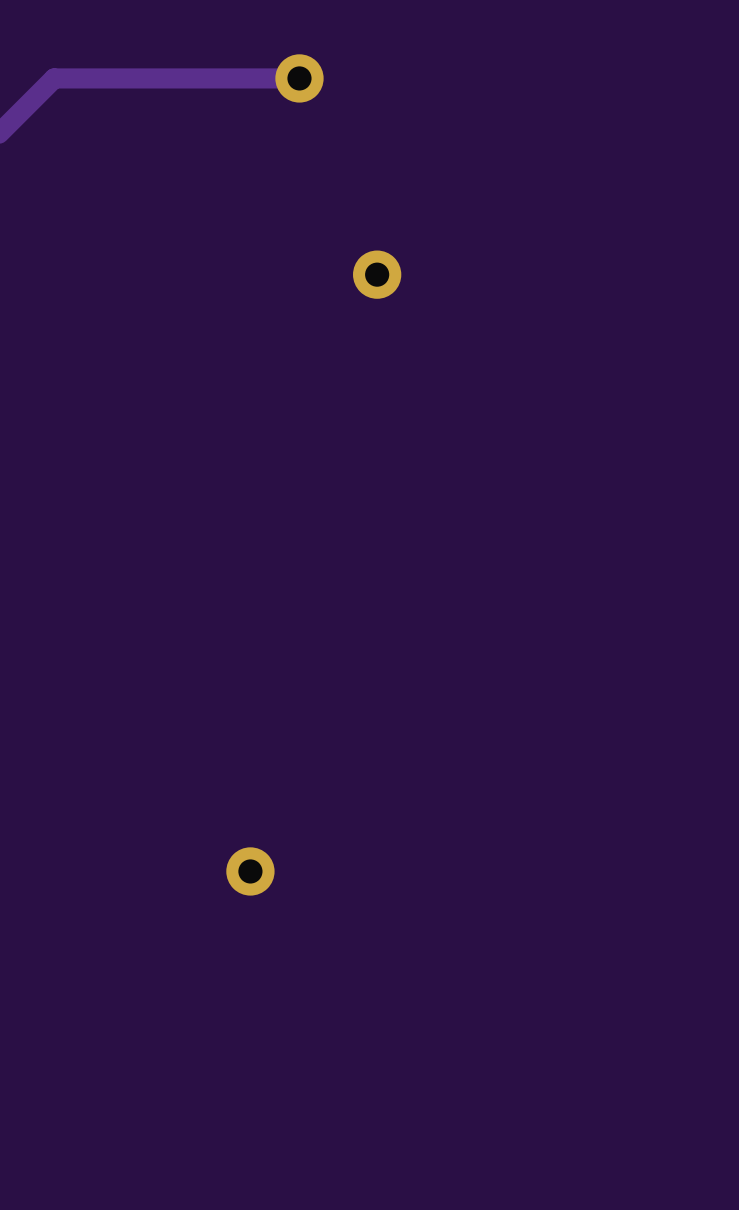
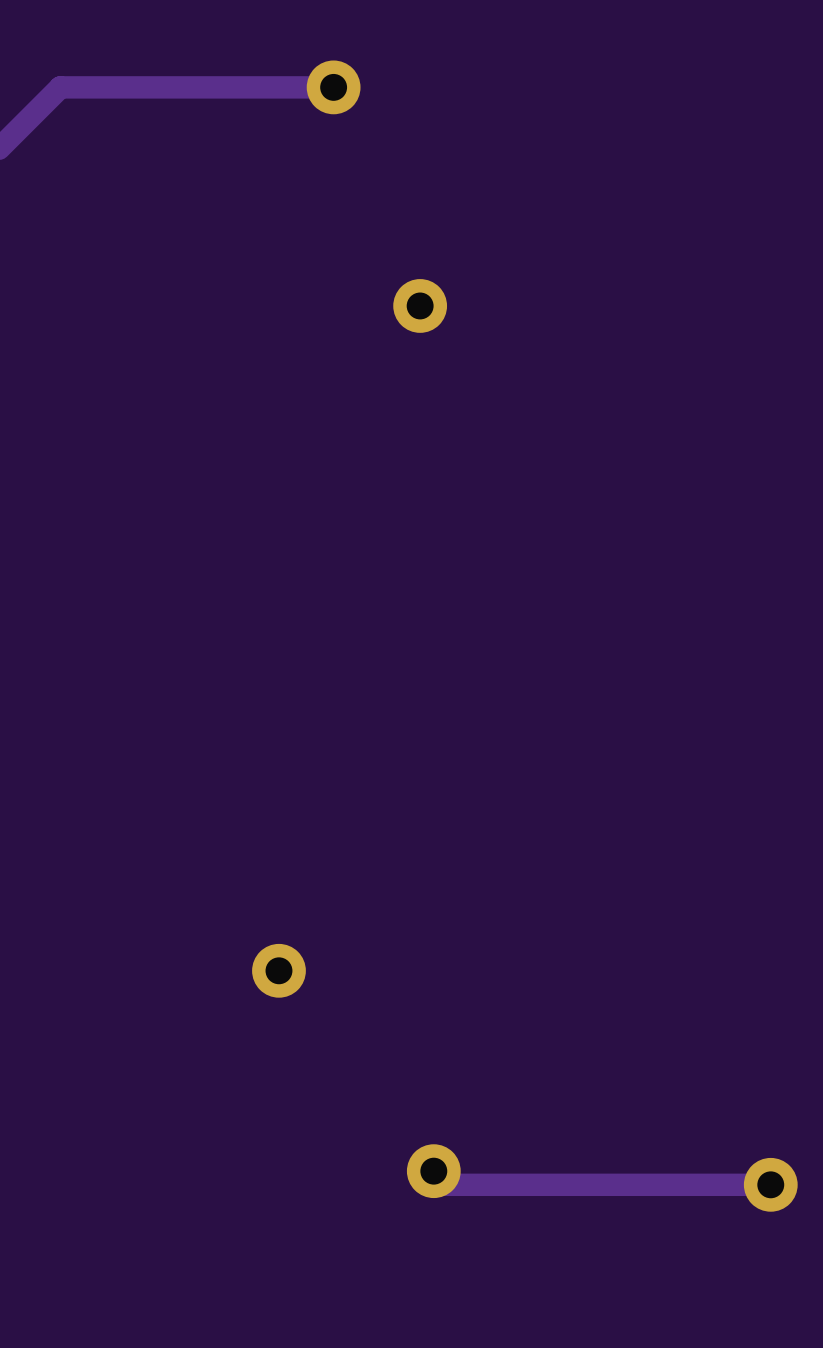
track: none -> (433, 1171) (447, 1184) (770, 1184)
via: none -> (433, 1171)
via: none -> (770, 1184)

